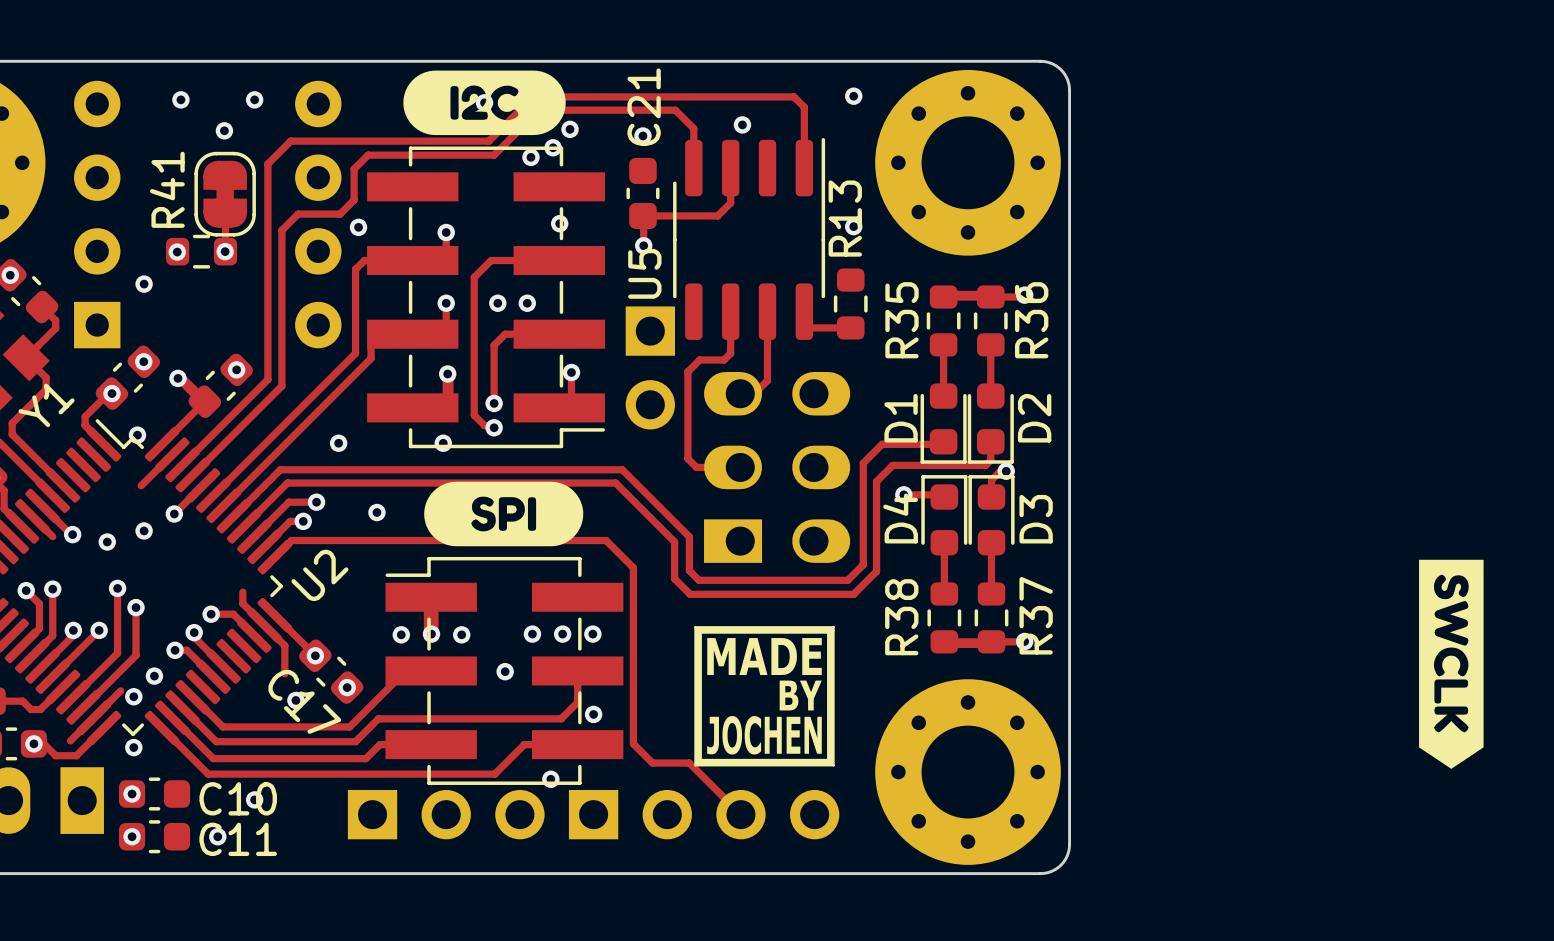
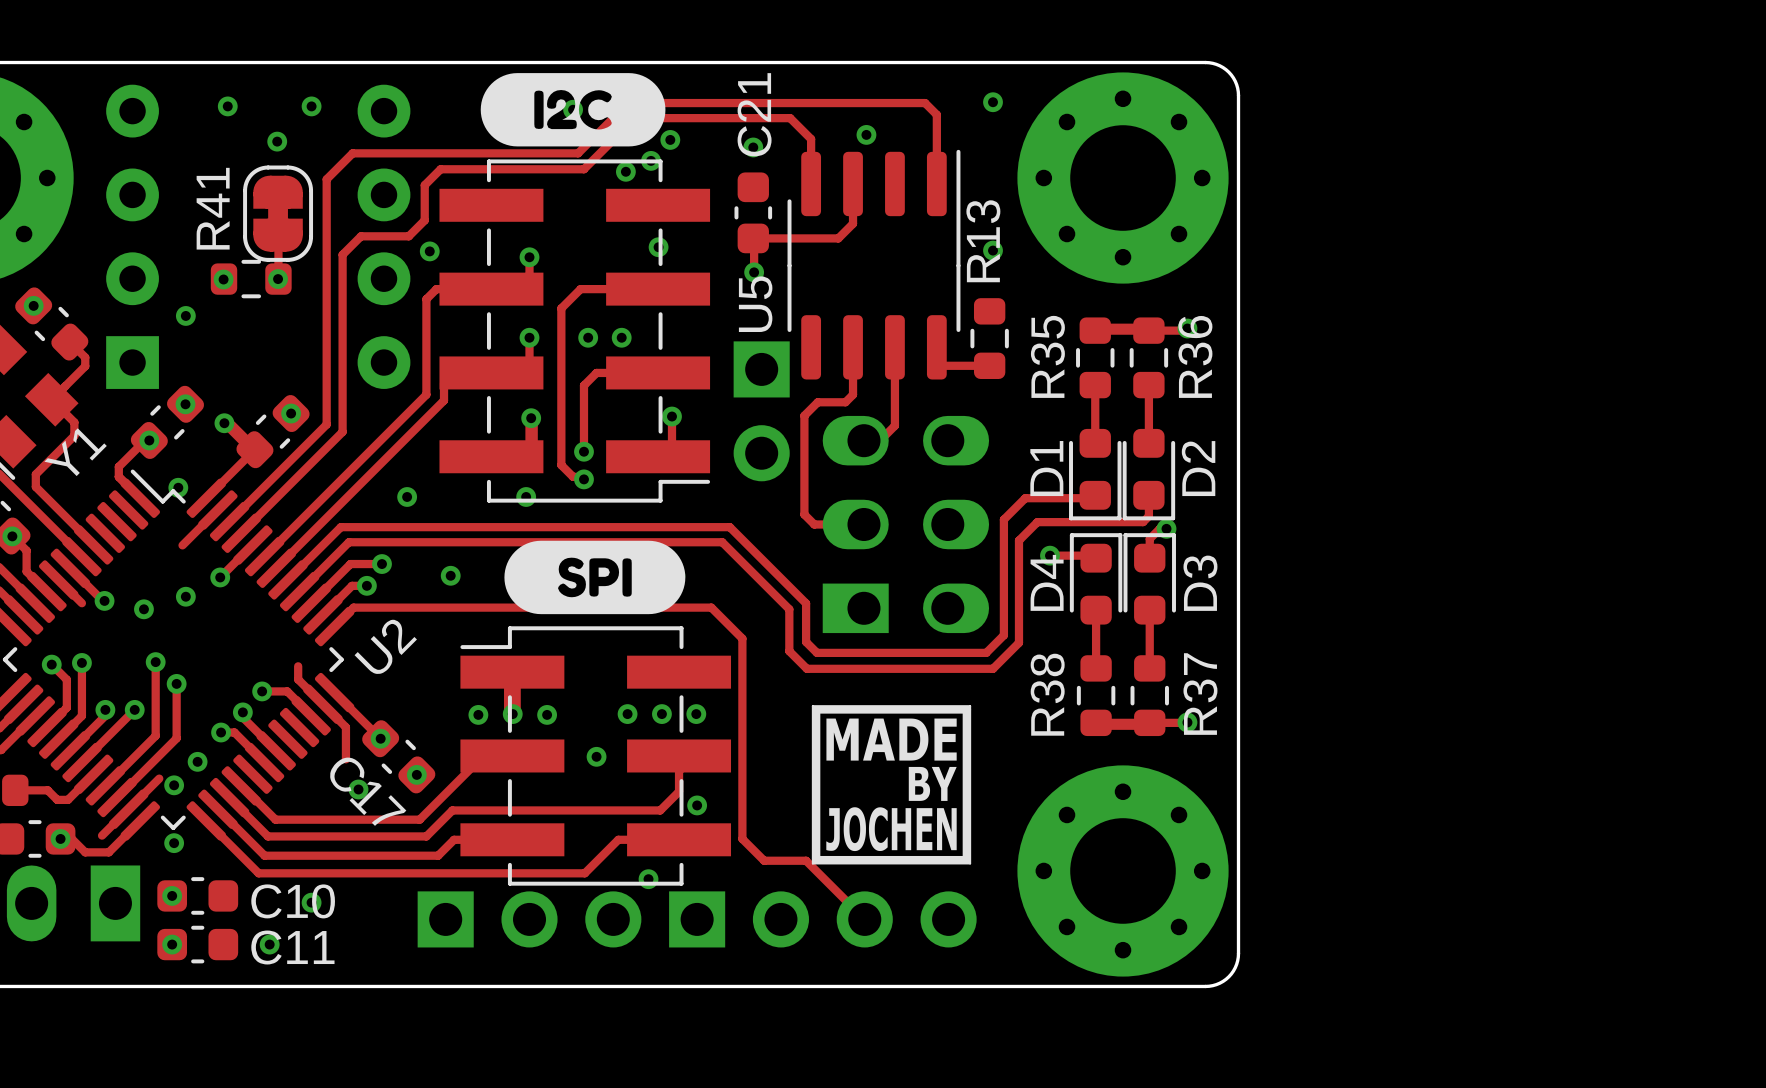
drawing: [1419, 559, 1484, 769] -> none

